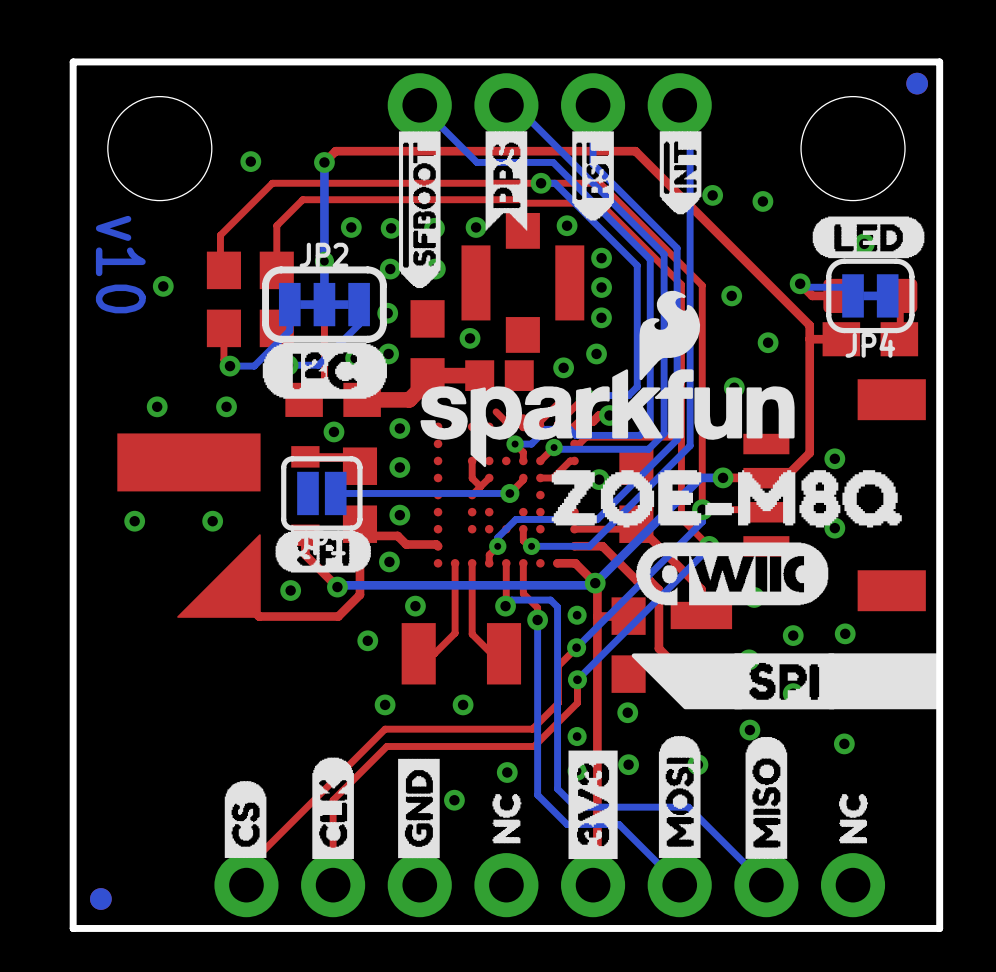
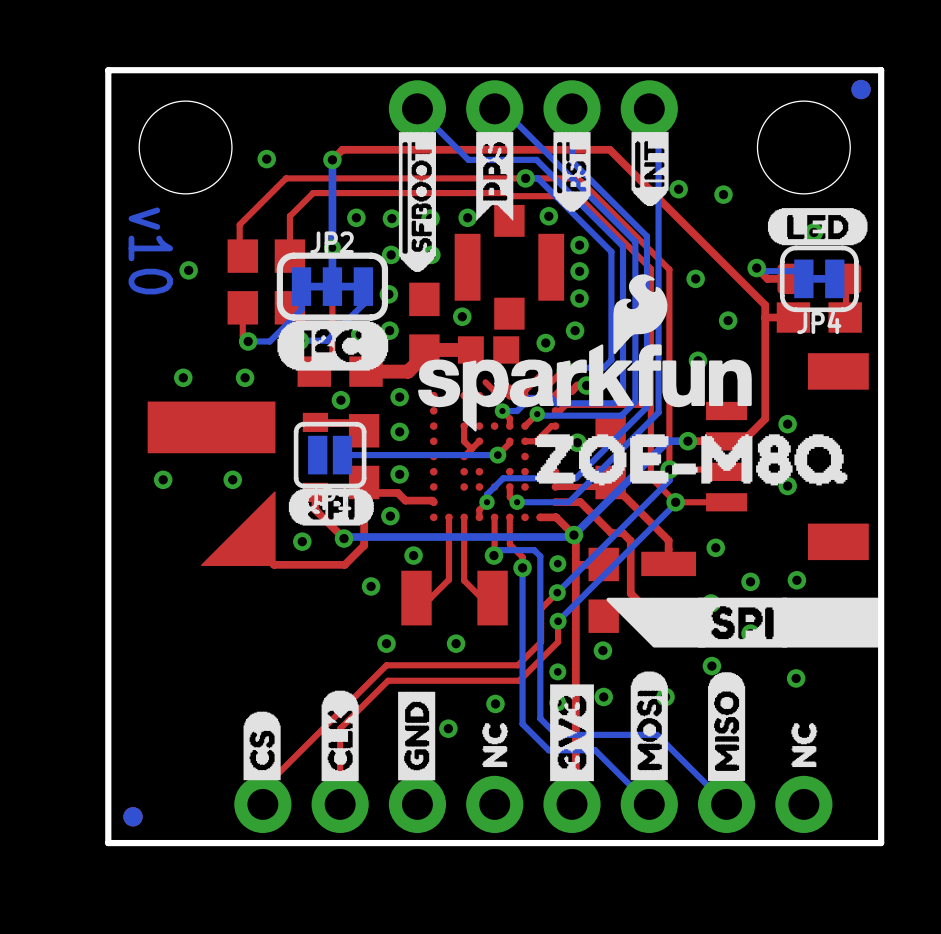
drawing: [636, 542, 829, 606] -> none

